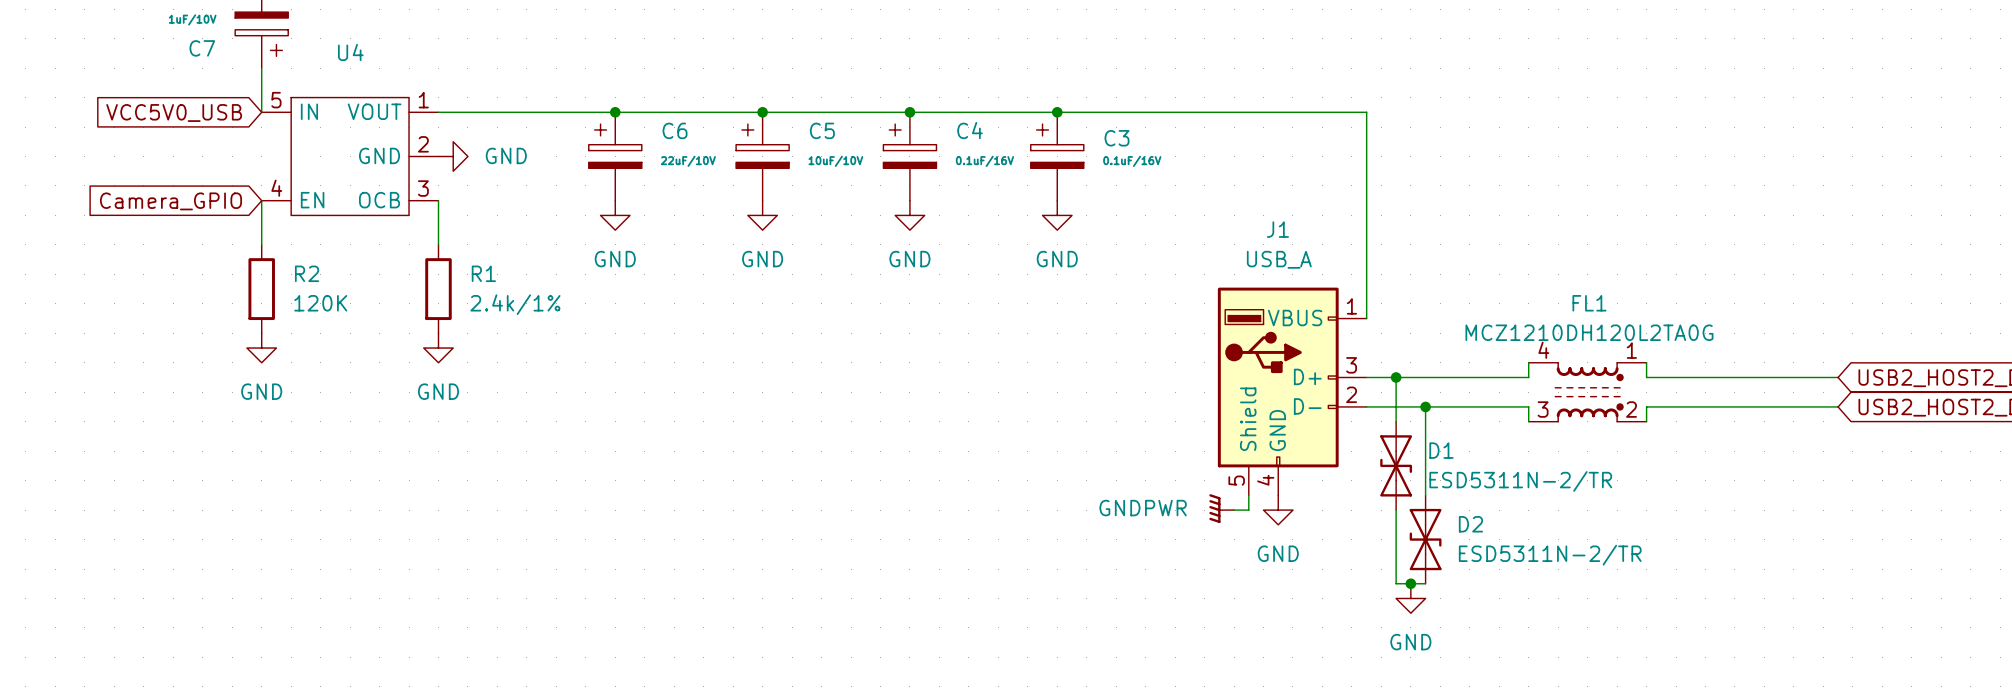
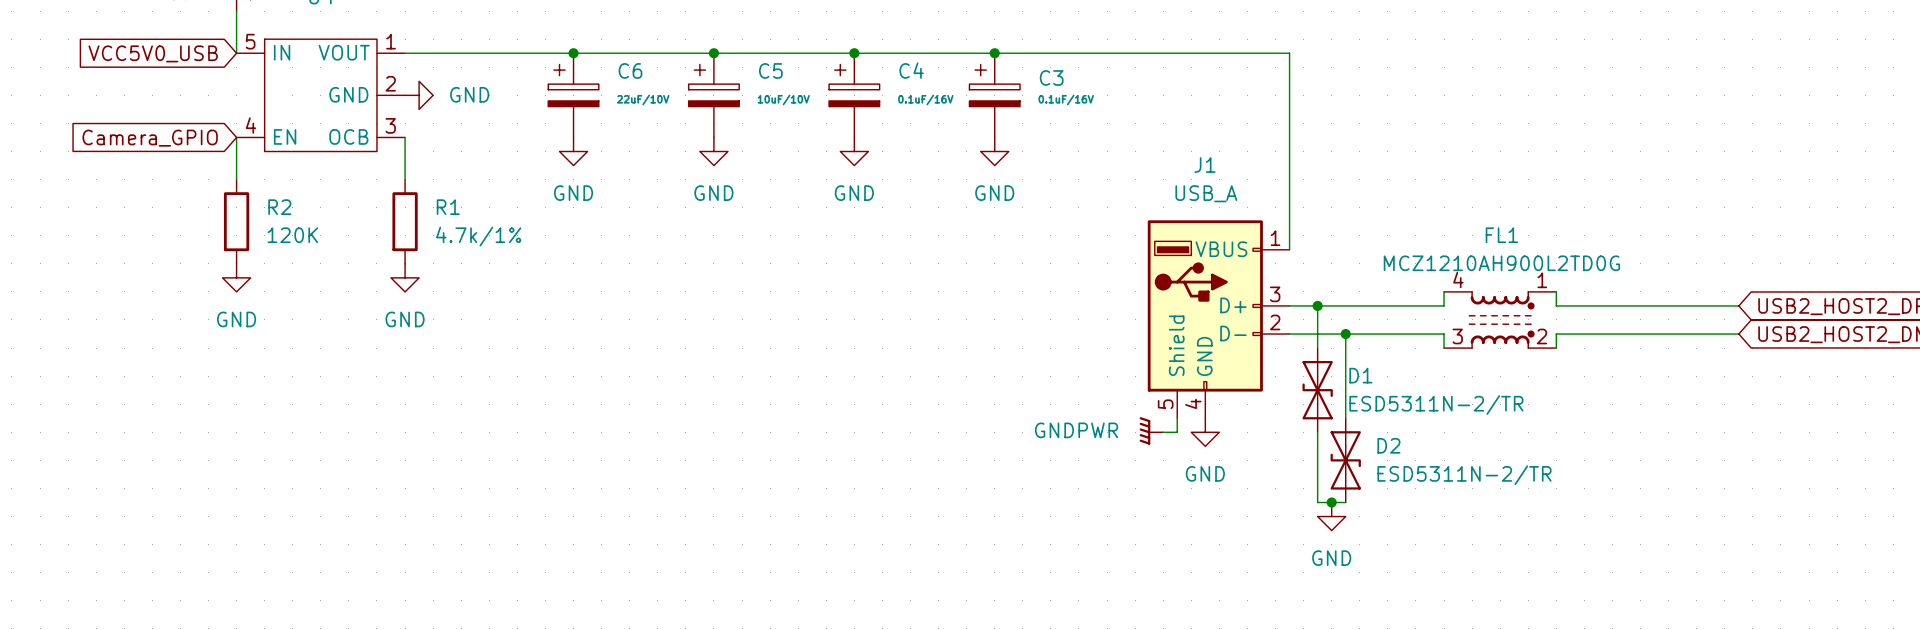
R1 value: 2.4k/1% (515, 304) -> 4.7k/1% (478, 236)
FL1 value: MCZ1210DH120L2TA0G (1589, 332) -> MCZ1210AH900L2TD0G (1501, 263)

